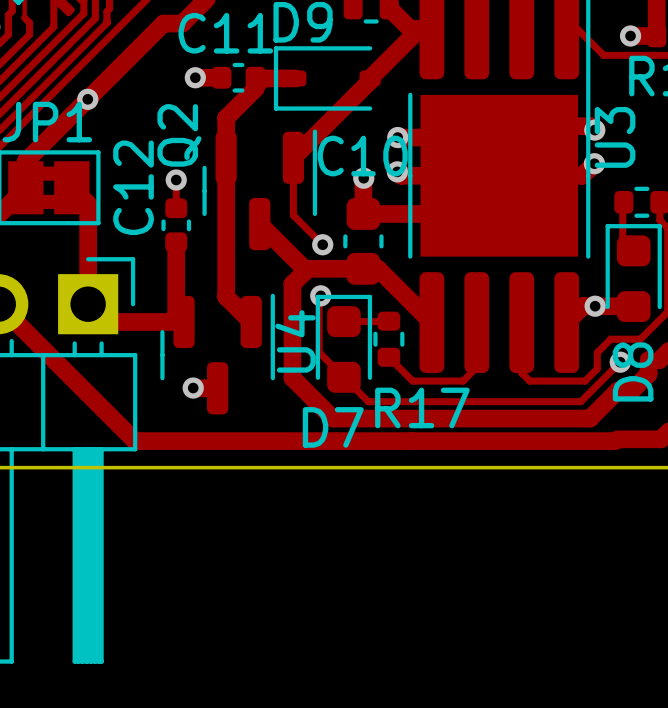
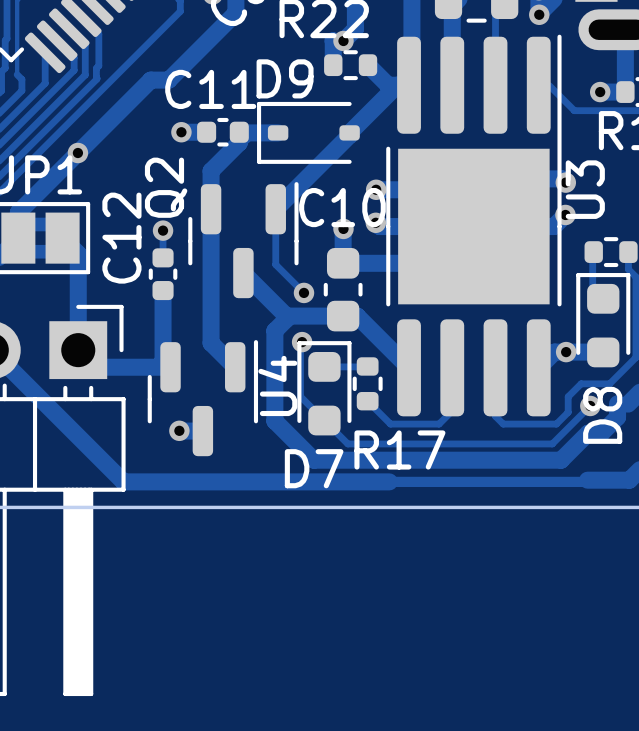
track width: thick (411, 441) (615, 441) -> thin (389, 481) (585, 481)

